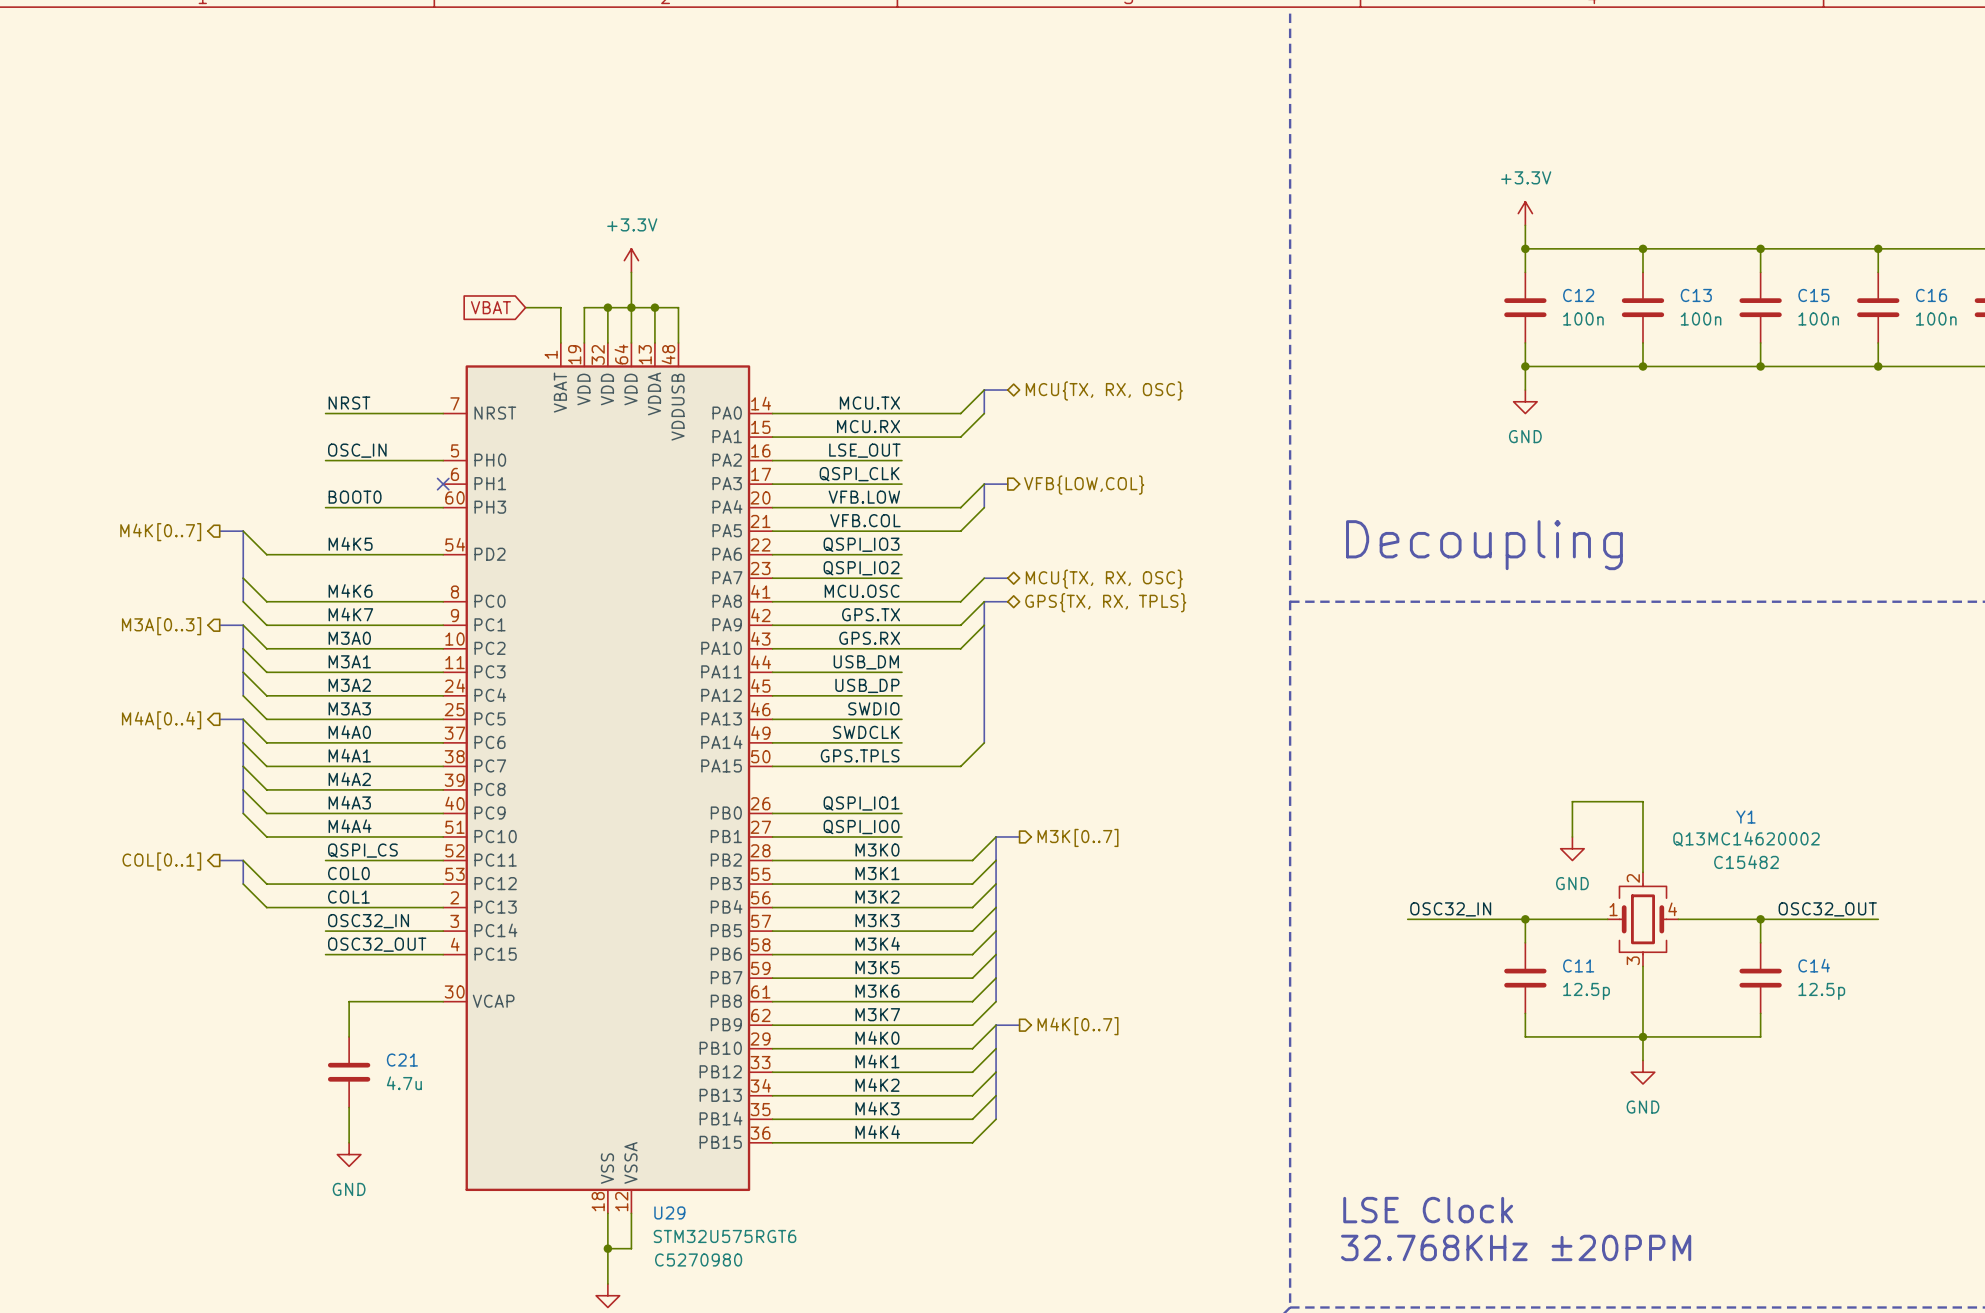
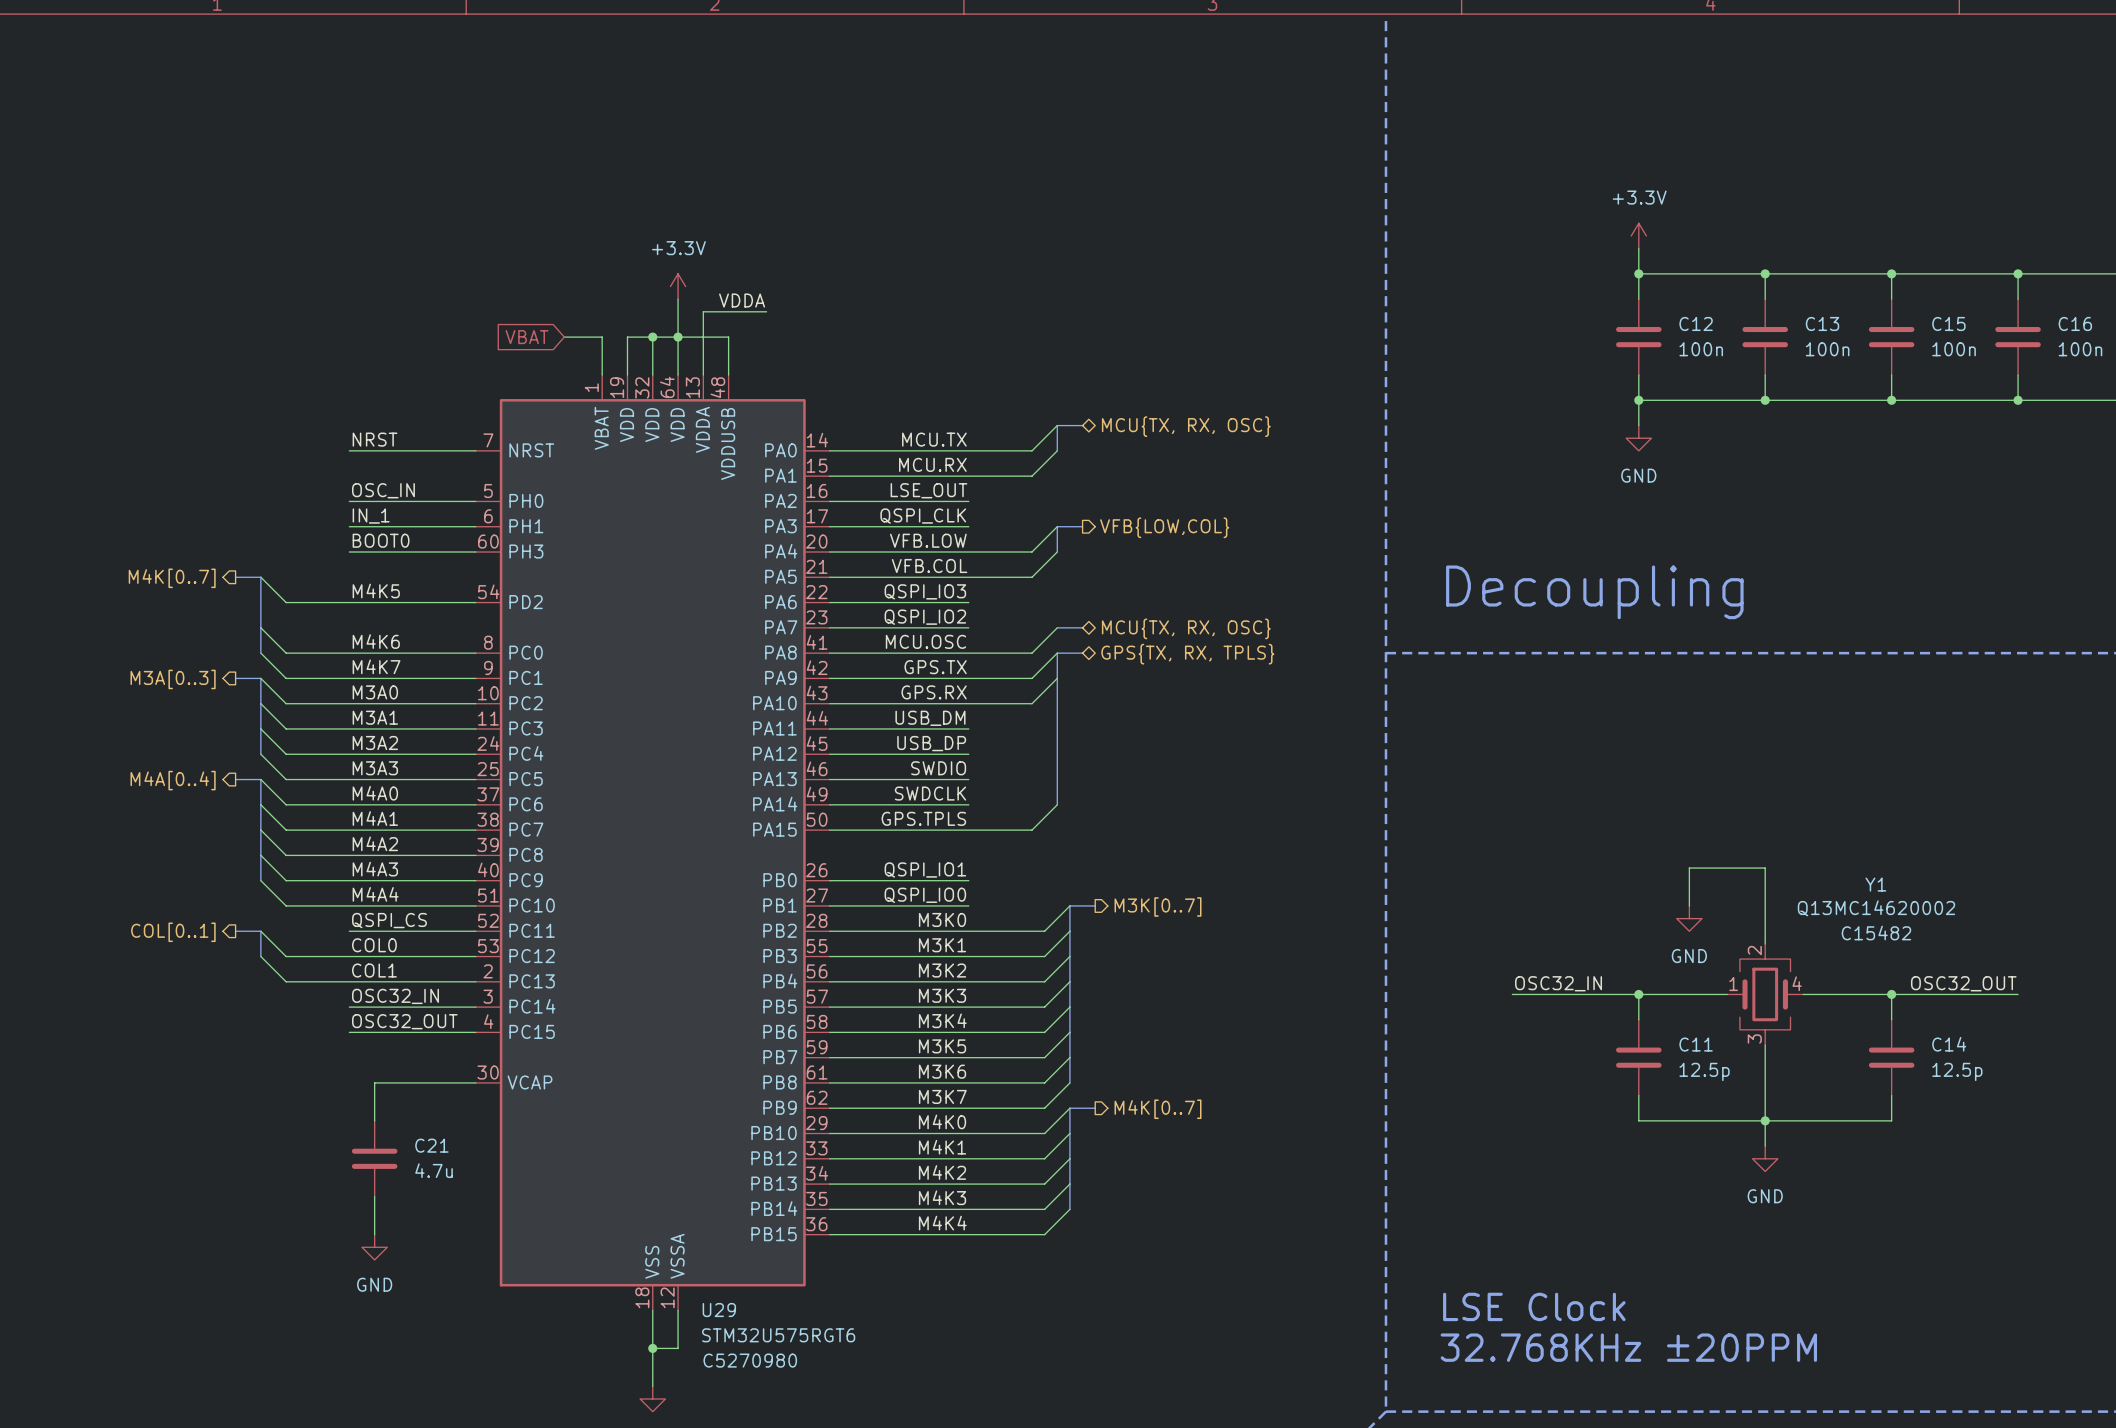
label: none -> VDDA (742, 300)
wire: none -> (766, 311) (703, 311) (703, 337)
junction: (654, 307) -> none
label: none -> IN_1 (371, 516)
wire: none -> (349, 526) (475, 526)
no-connect mark: (443, 484) -> none

